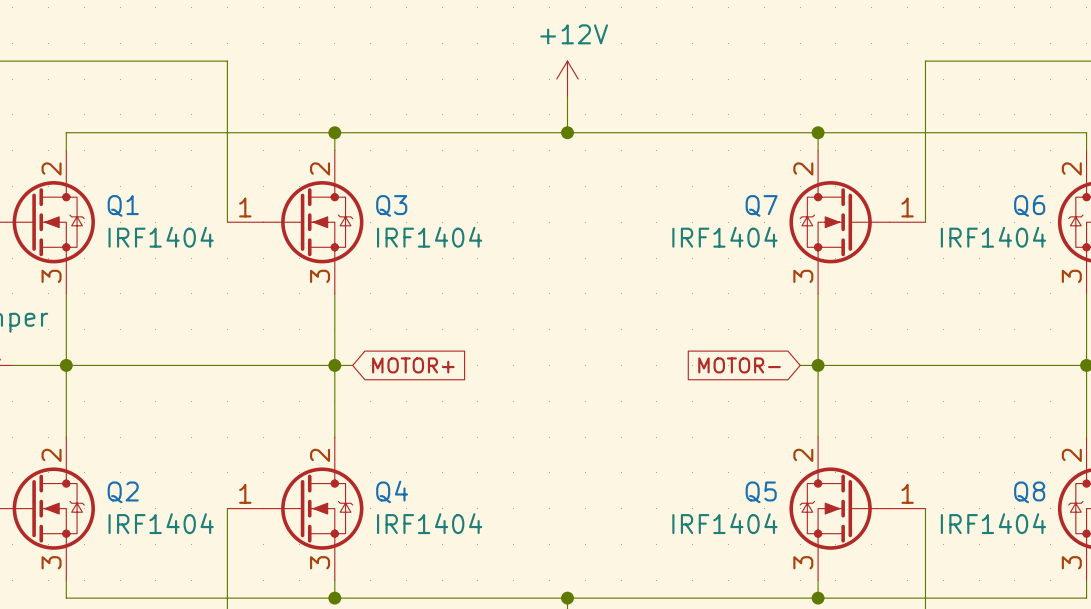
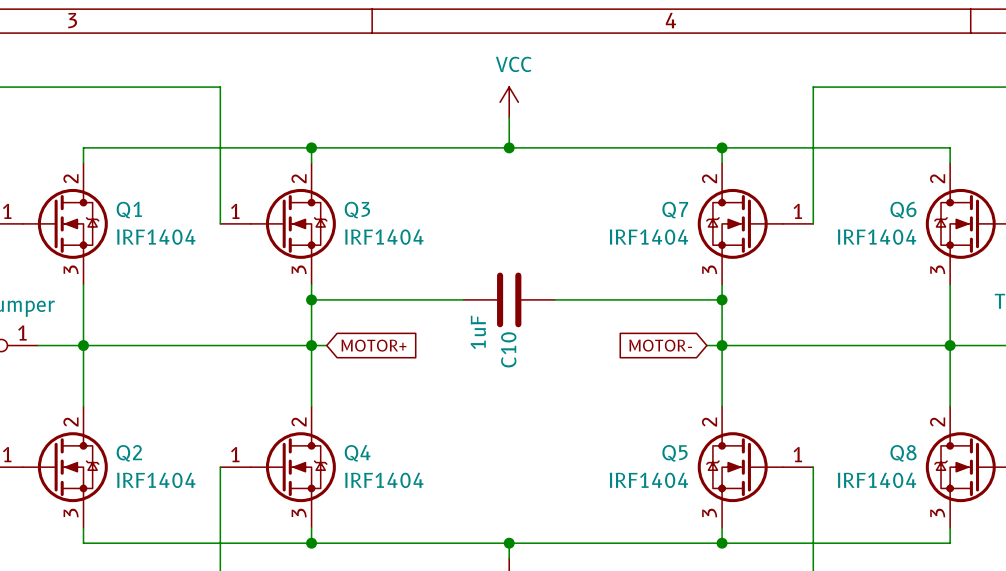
power symbol: +12V (567, 79) -> VCC (509, 102)
wire: none -> (311, 299) (463, 299)
junction: none -> (311, 299)
C10: none -> 1uF (509, 299)
wire: none -> (554, 299) (722, 299)
junction: none -> (722, 299)

